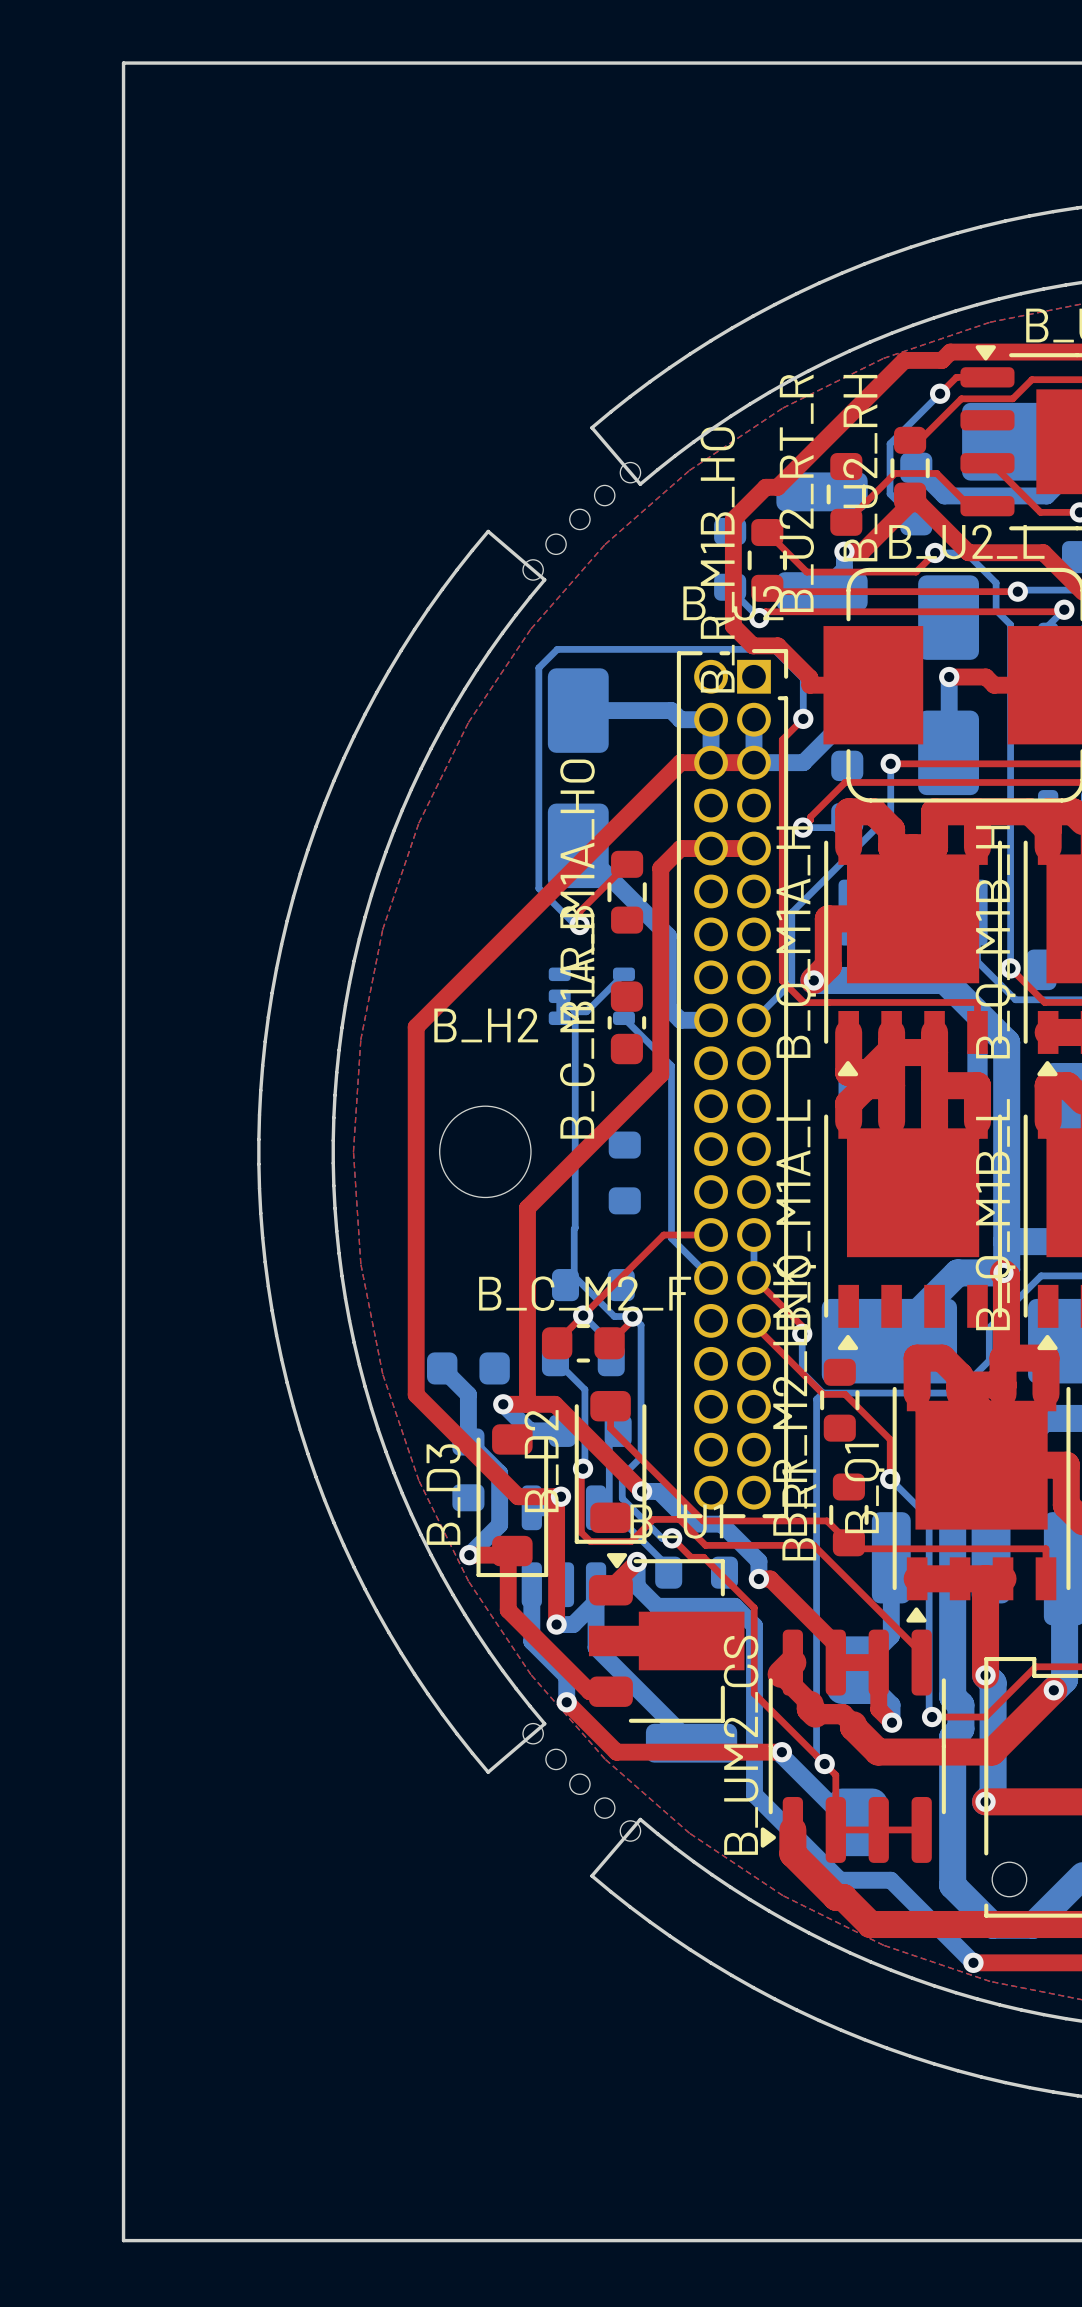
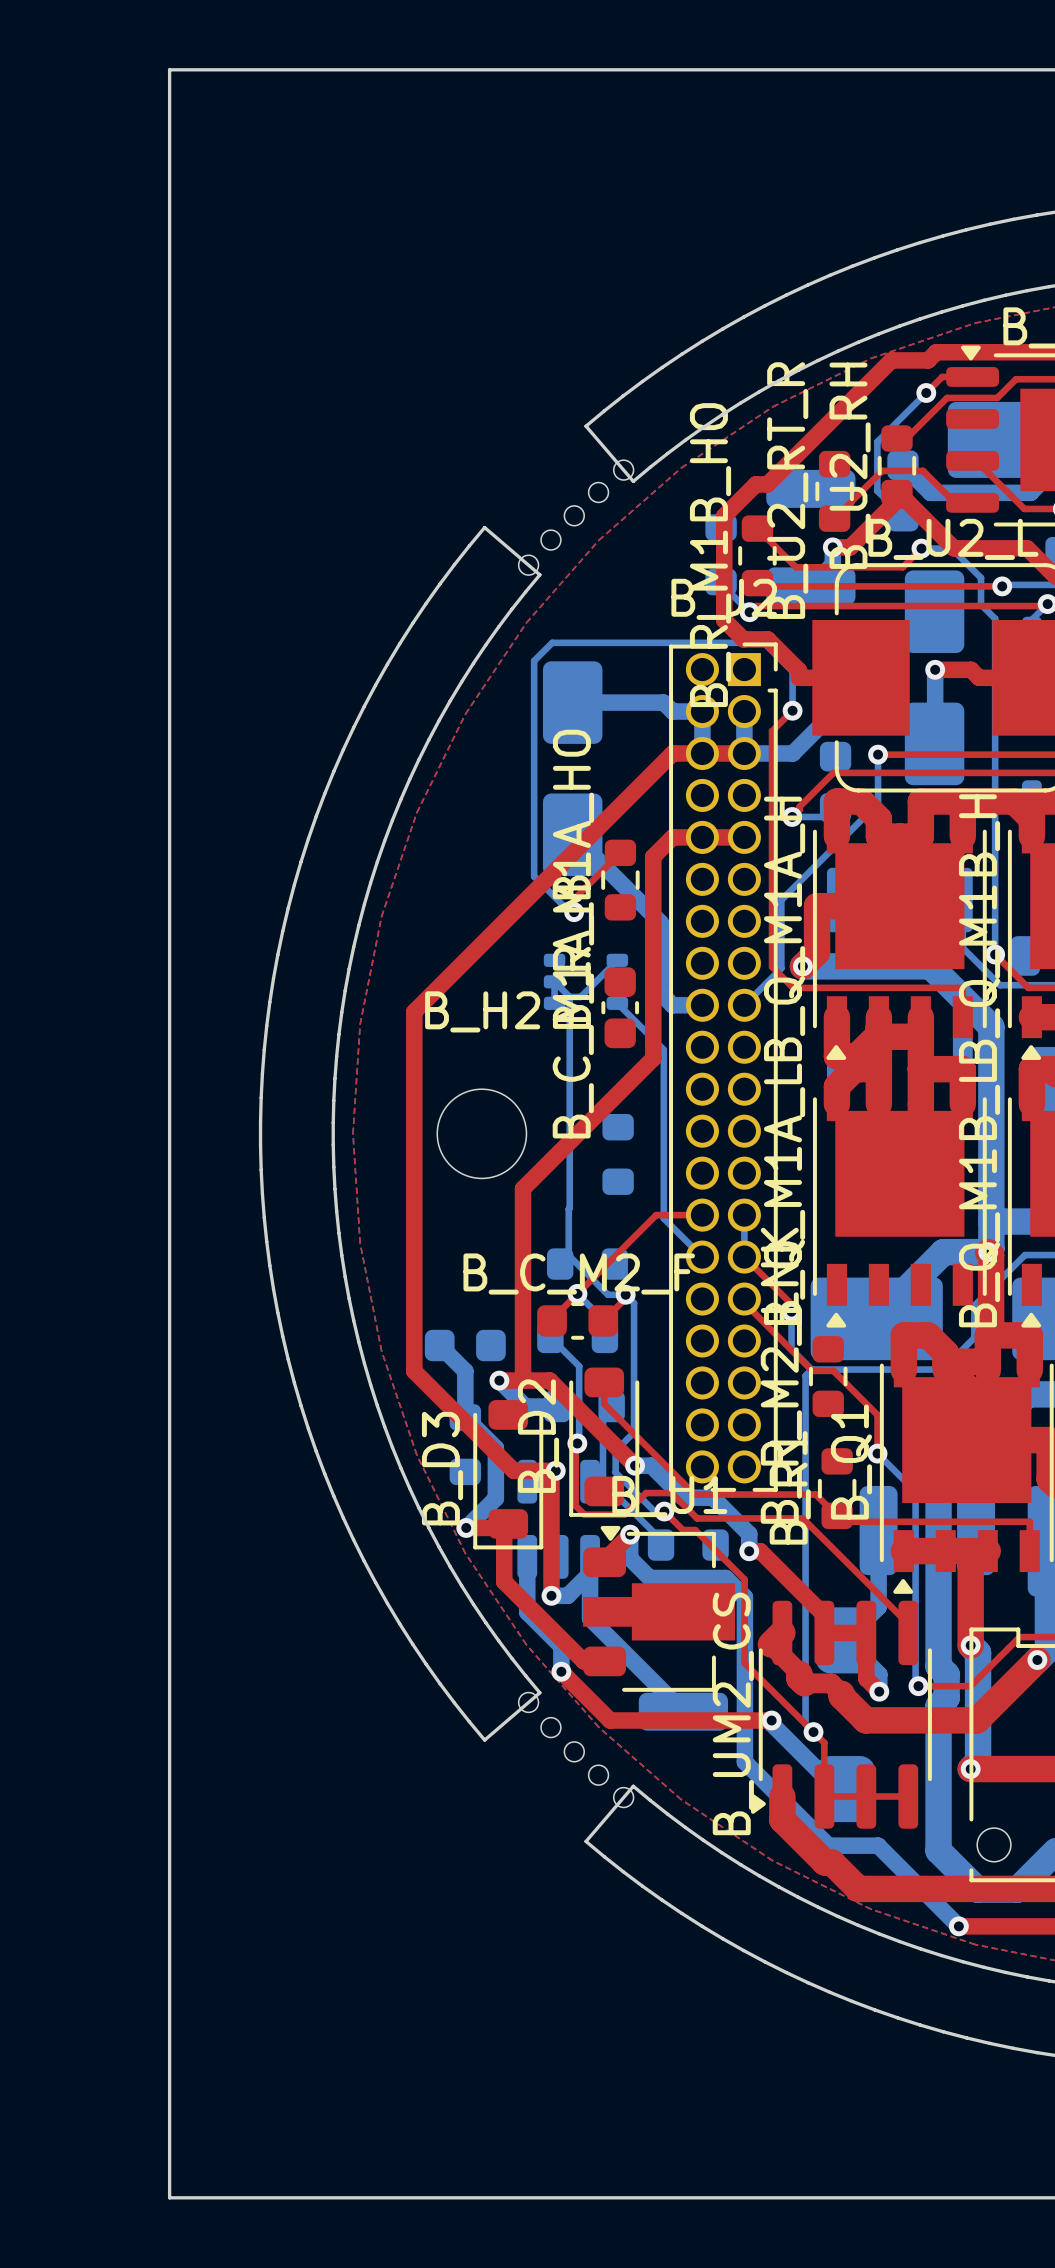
board edge: (165, 63) (123, 63) (123, 2240) (165, 2240) -> (169, 69) (169, 2197)

